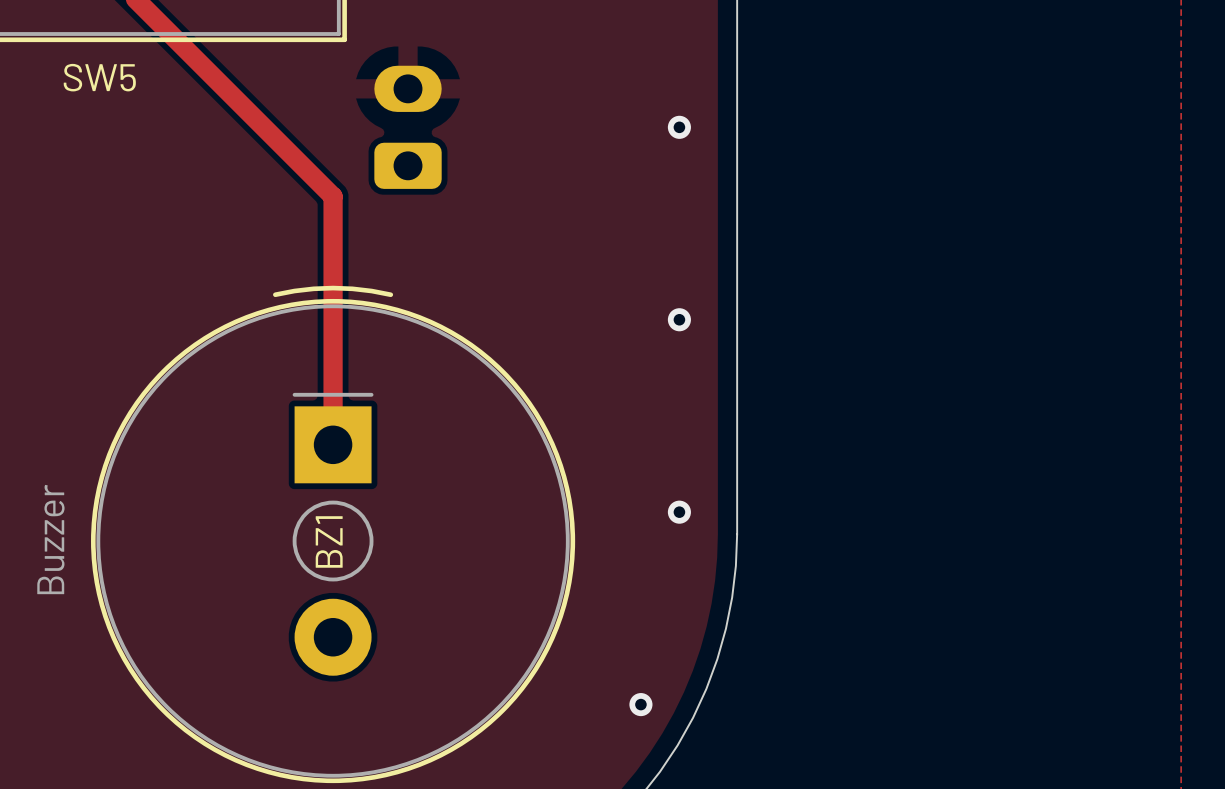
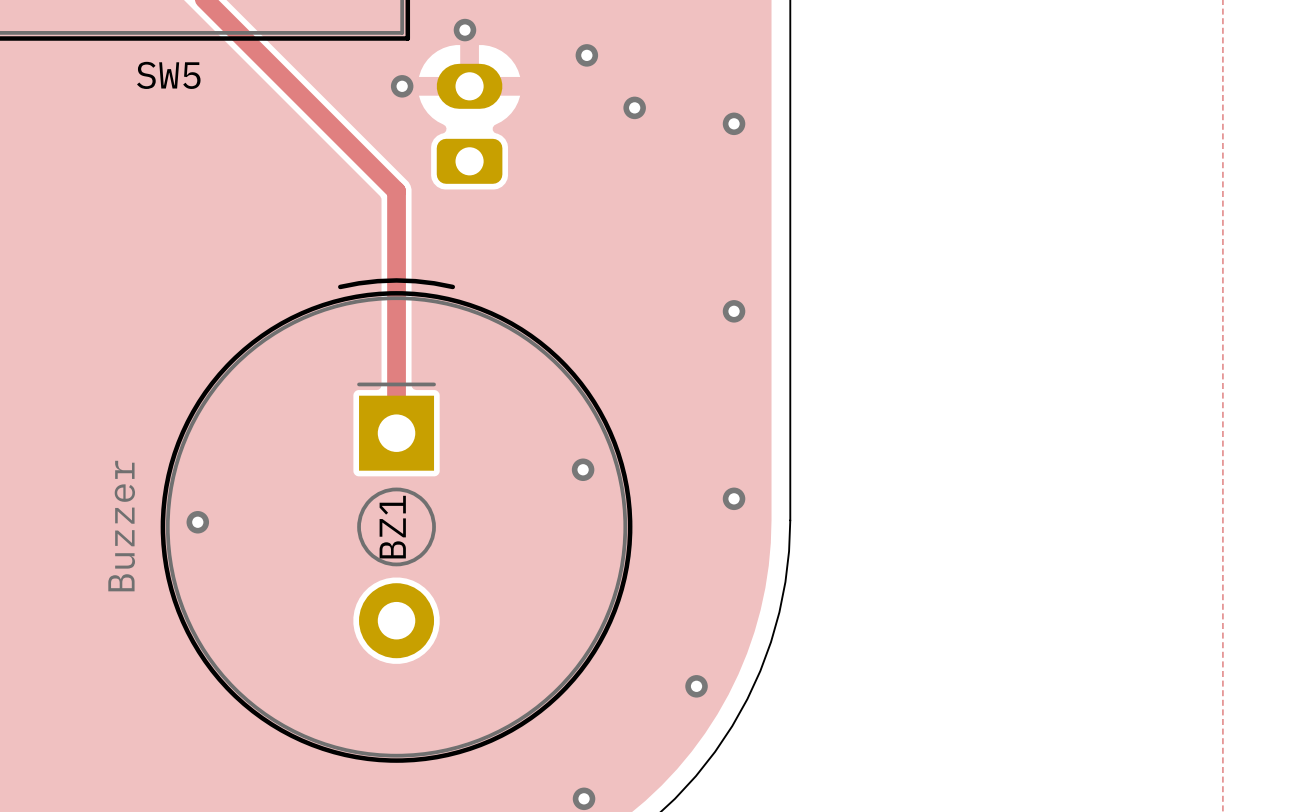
via: none -> (464, 30)
via: none -> (586, 55)
via: none -> (402, 86)
via: none -> (634, 107)
via: none -> (583, 469)
via: none -> (197, 522)

